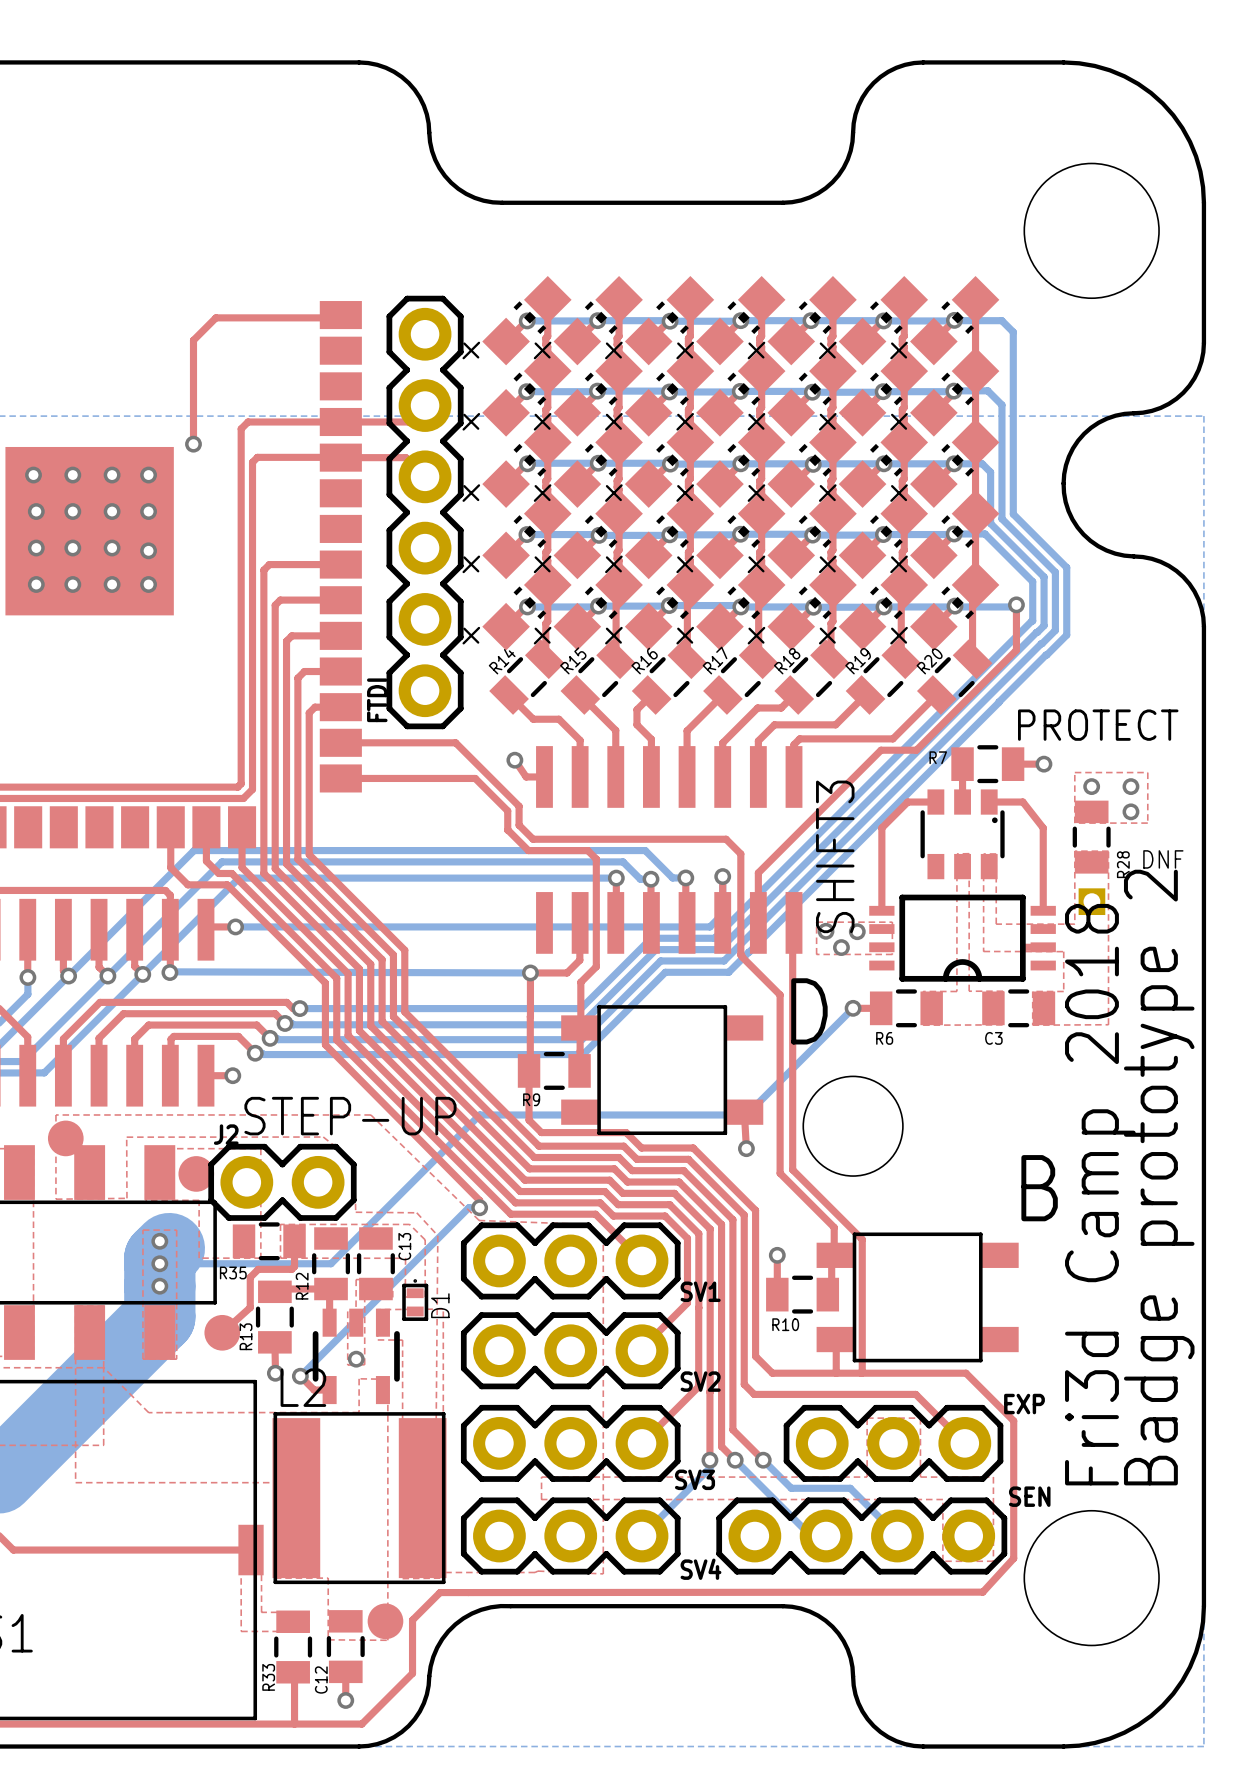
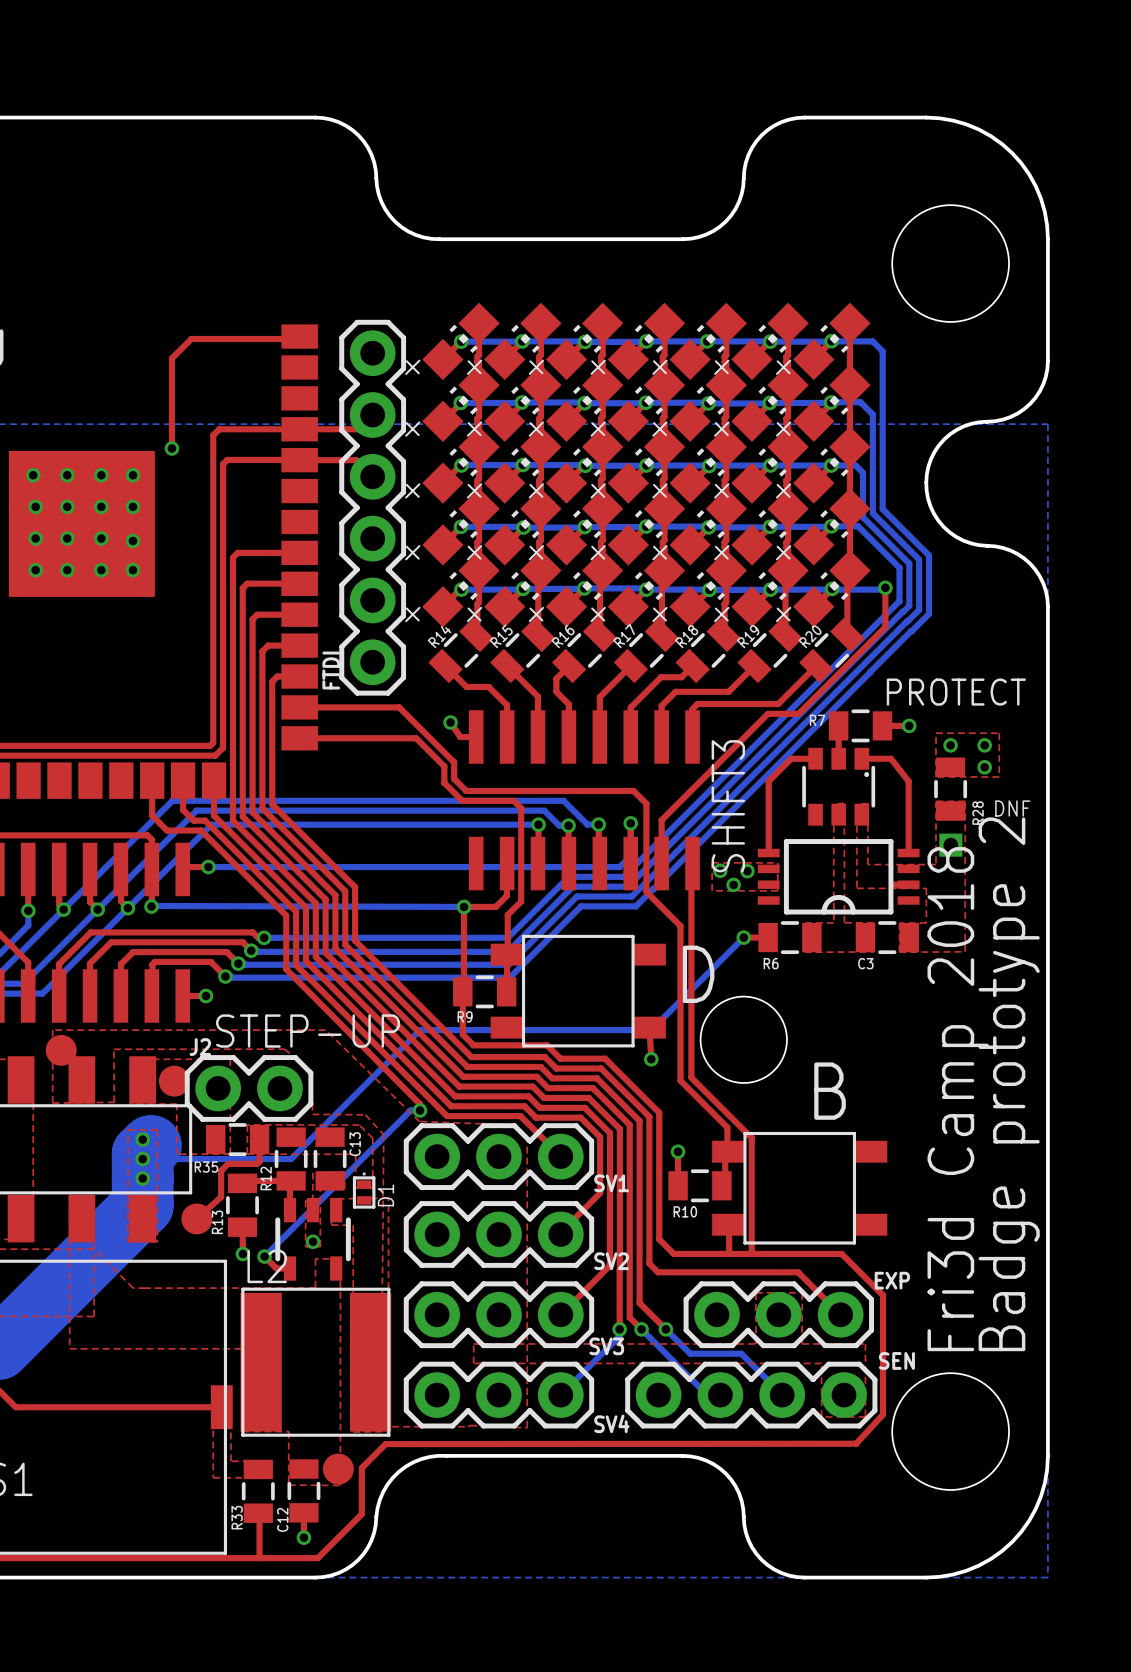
D name position: D (809, 1011) -> D (698, 974)
B name position: B (1039, 1188) -> B (830, 1091)

